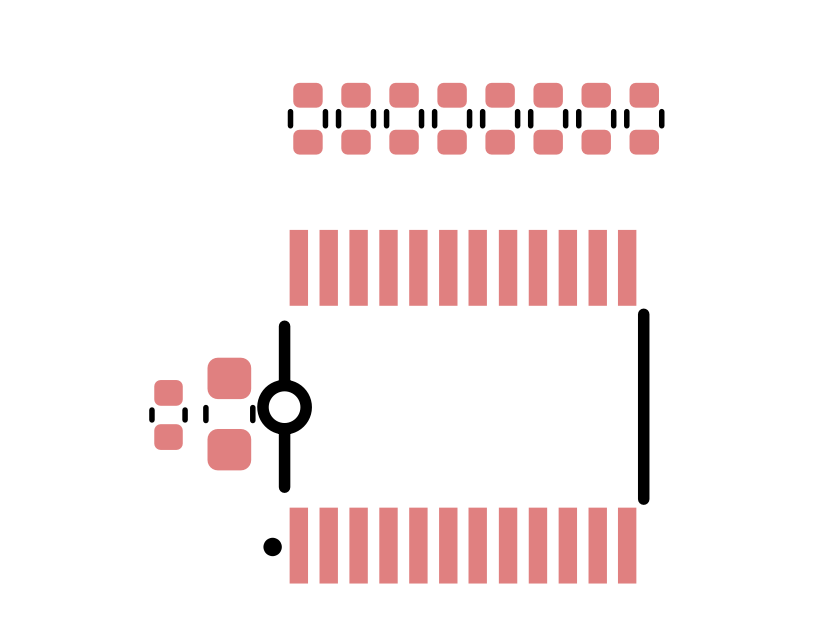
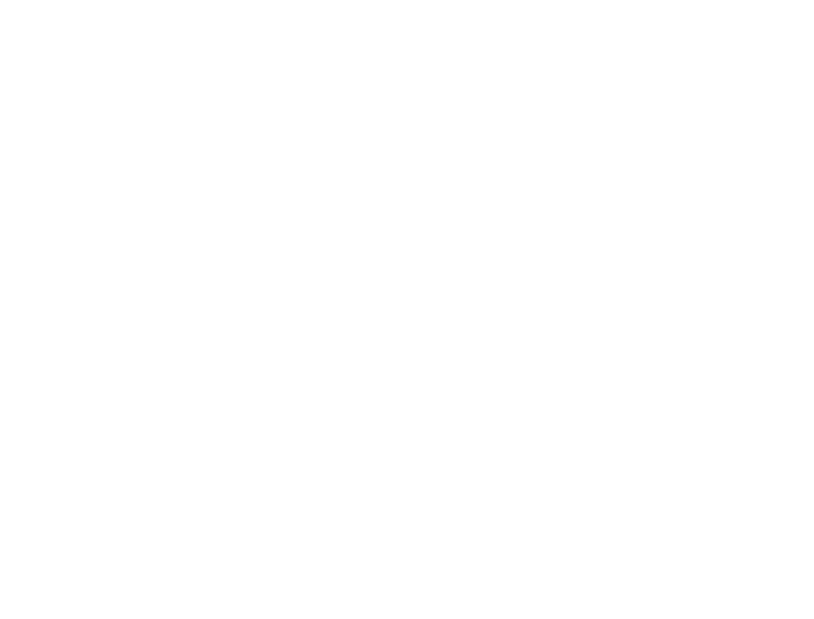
part: (307, 118) -> none
part: (356, 118) -> none
part: (404, 118) -> none
part: (452, 118) -> none
part: (500, 118) -> none
part: (548, 118) -> none
part: (596, 118) -> none
part: (644, 118) -> none
part: (453, 406) -> none
part: (168, 414) -> none
part: (229, 414) -> none

